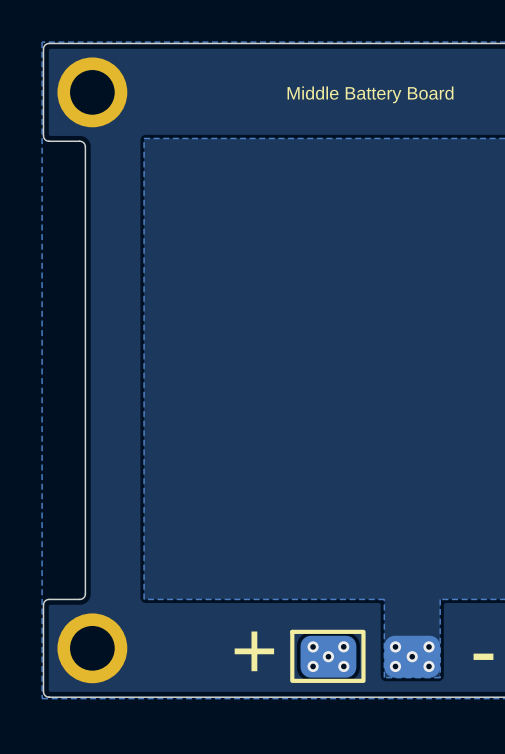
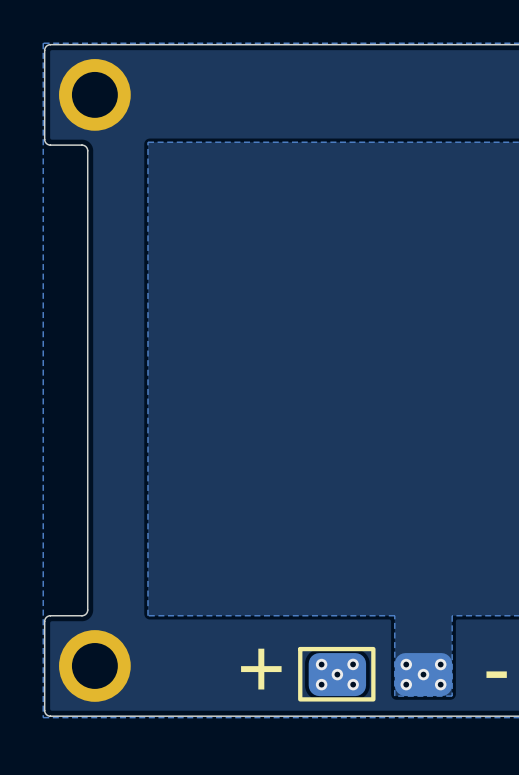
text: Middle Battery Board (370, 94) -> none

